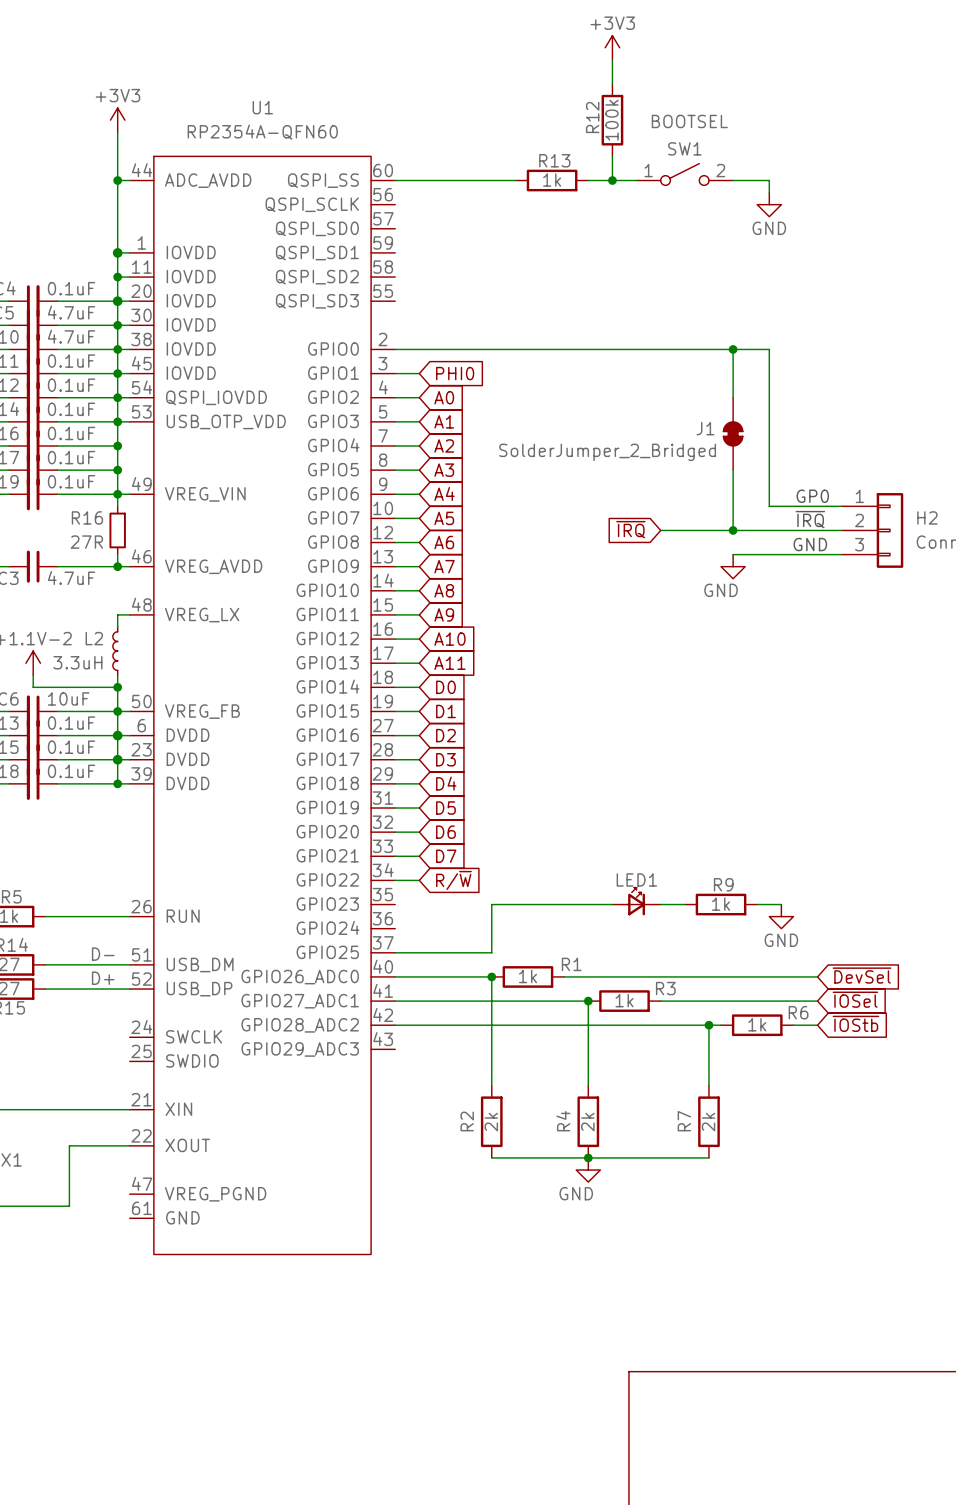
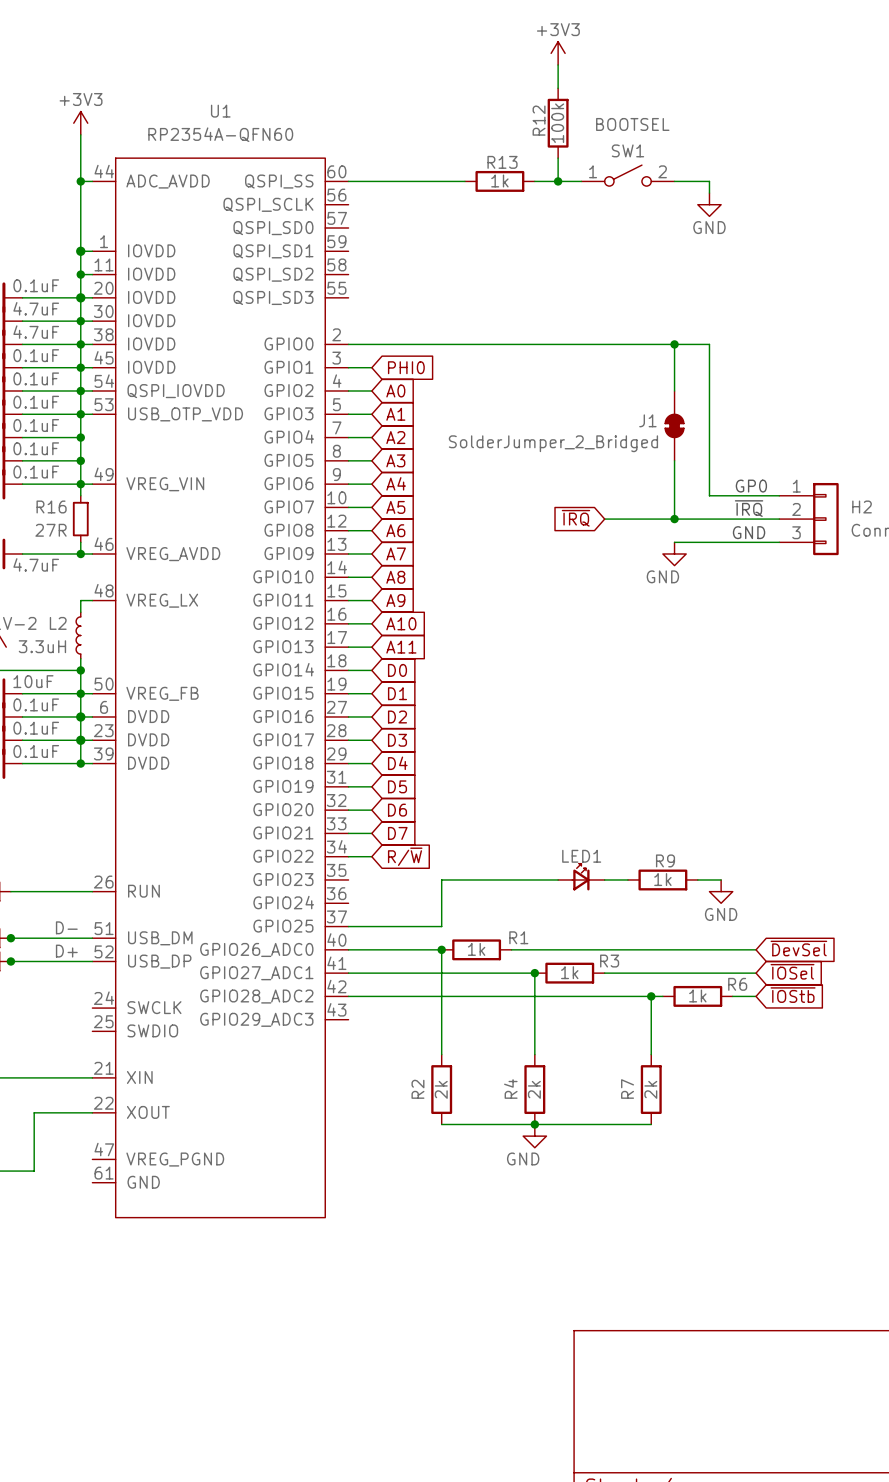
junction: none -> (10, 938)
junction: none -> (10, 961)

